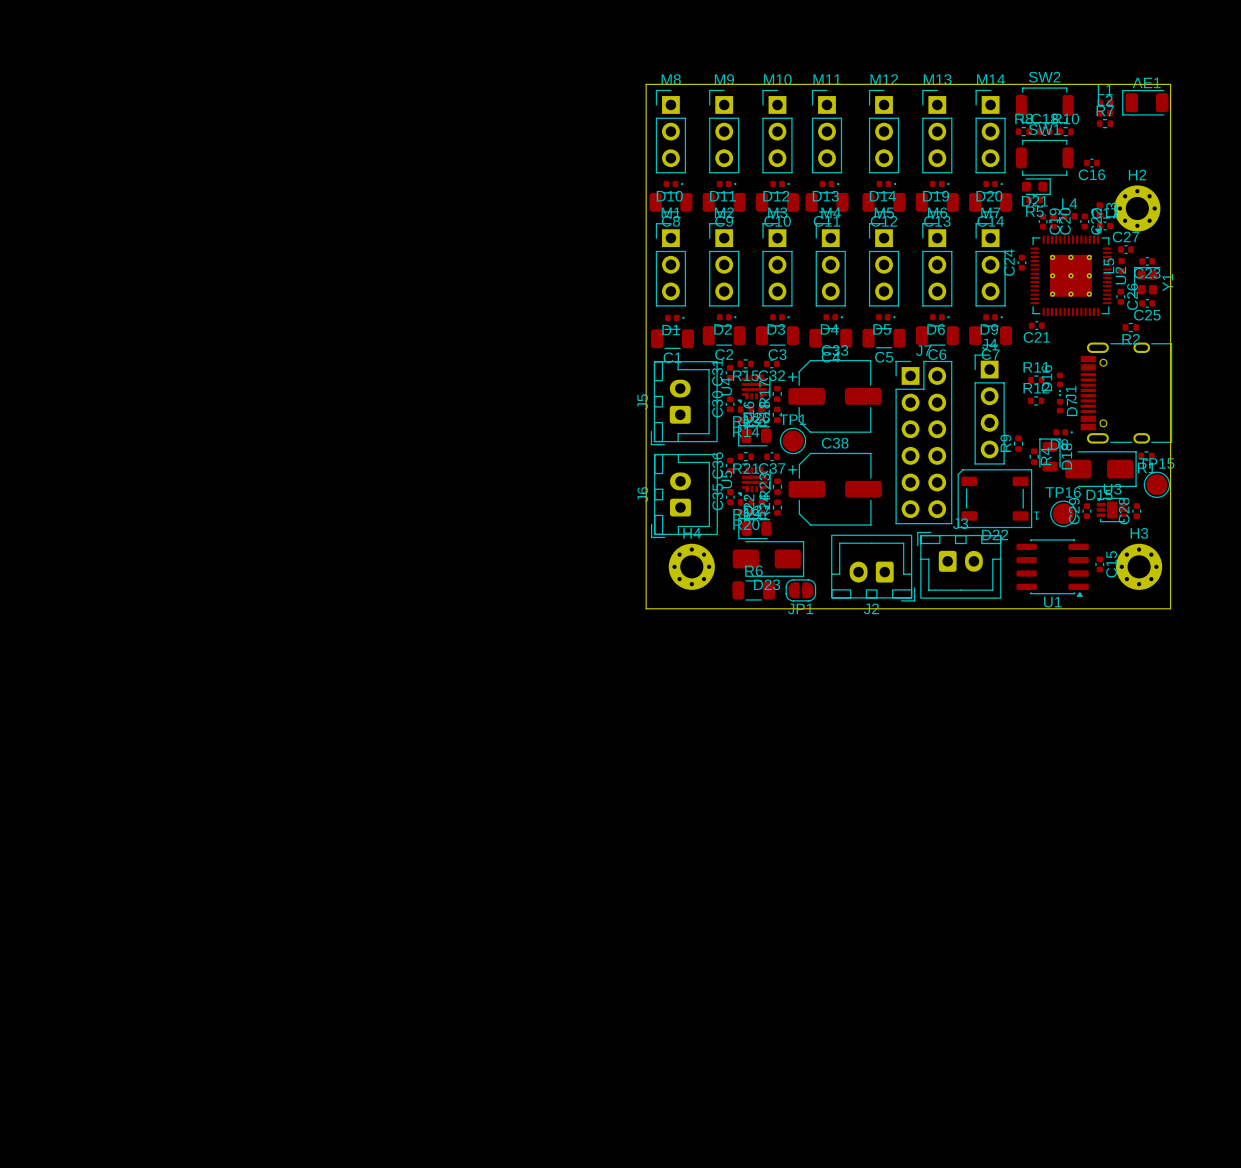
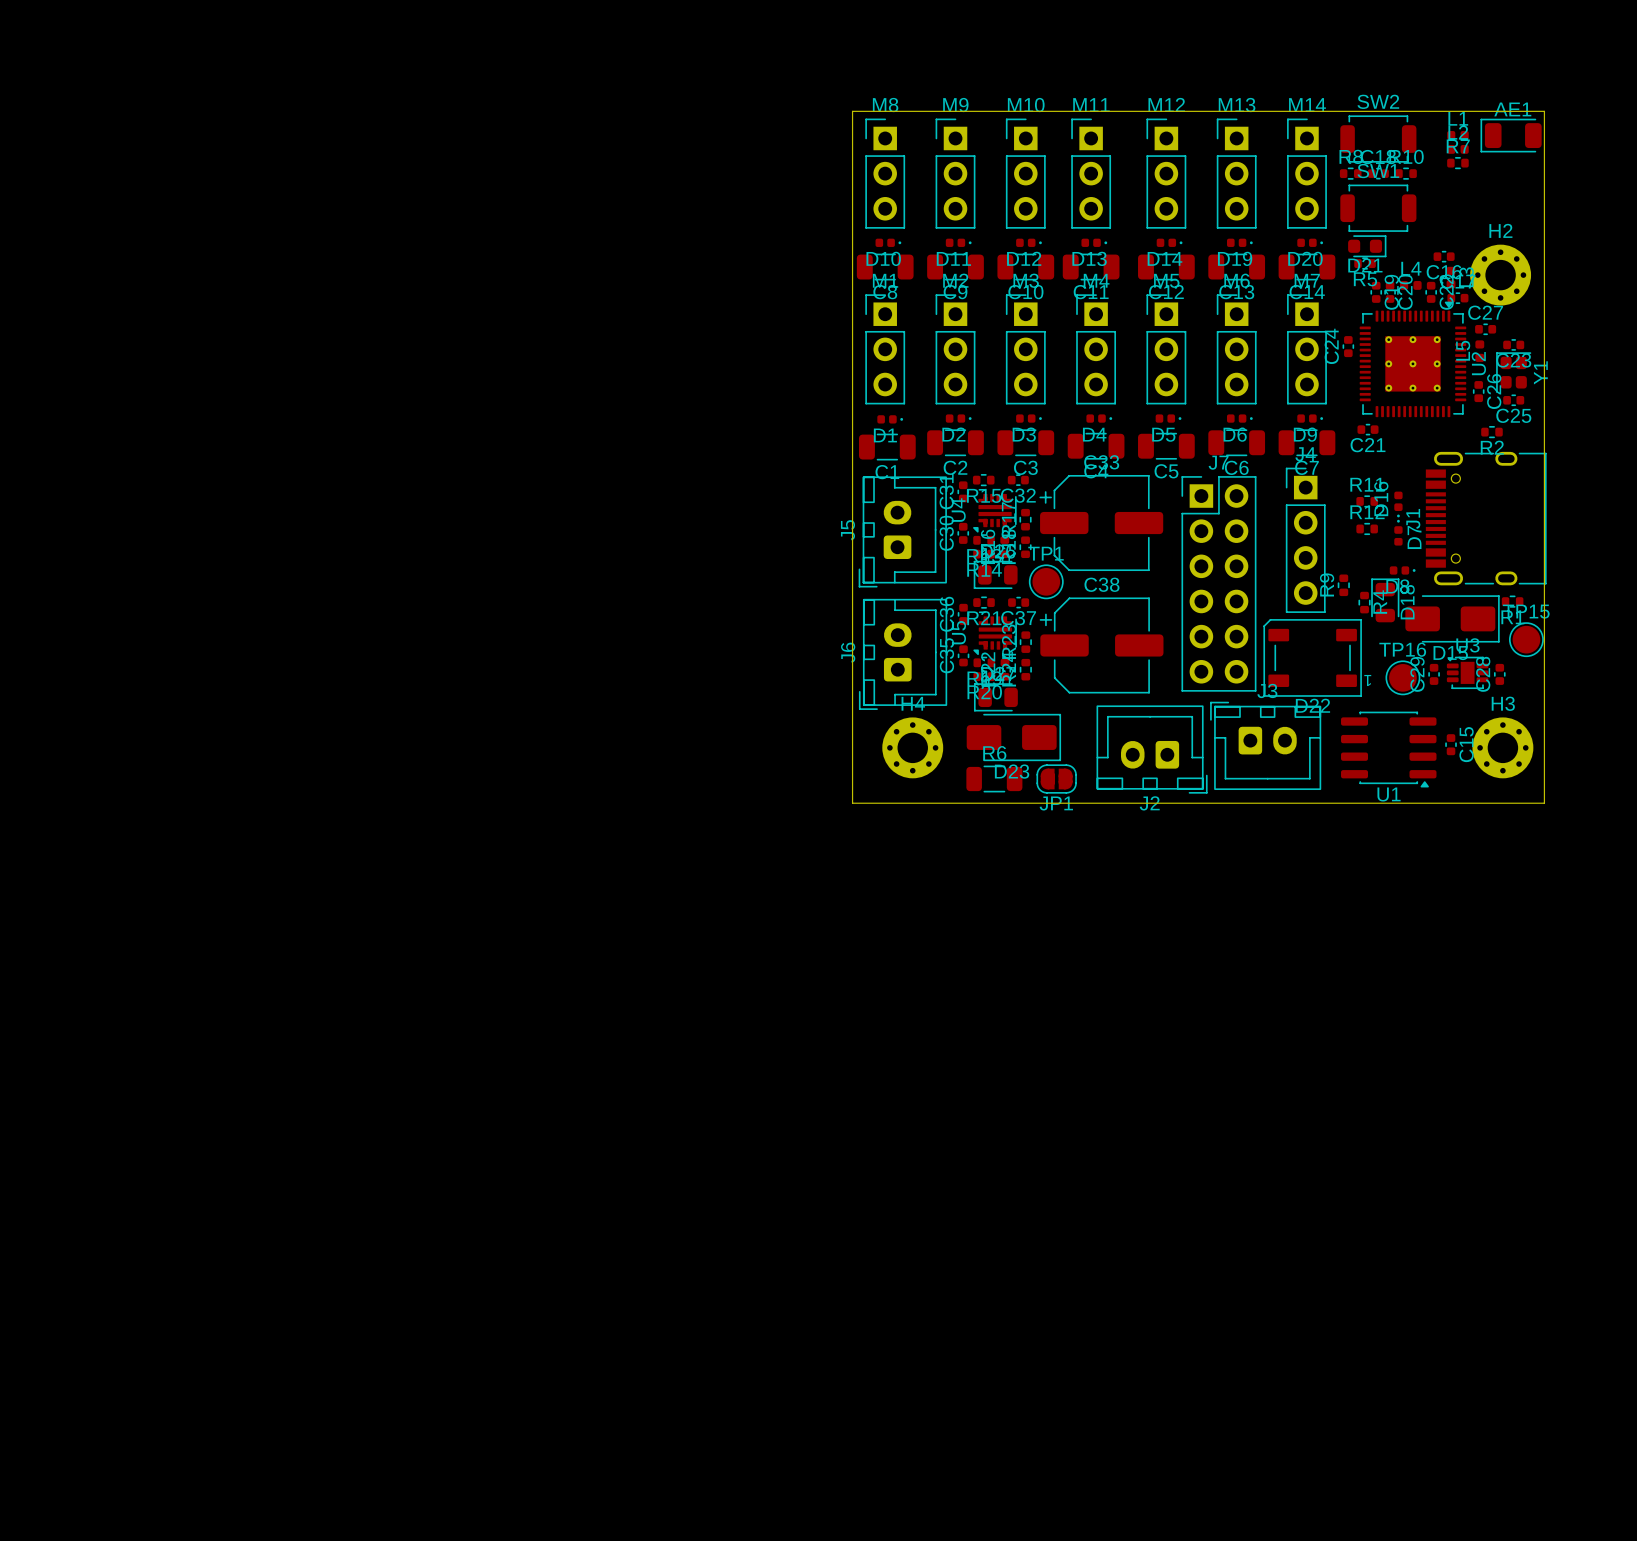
C16 position: (1091, 163) -> (1444, 256)

